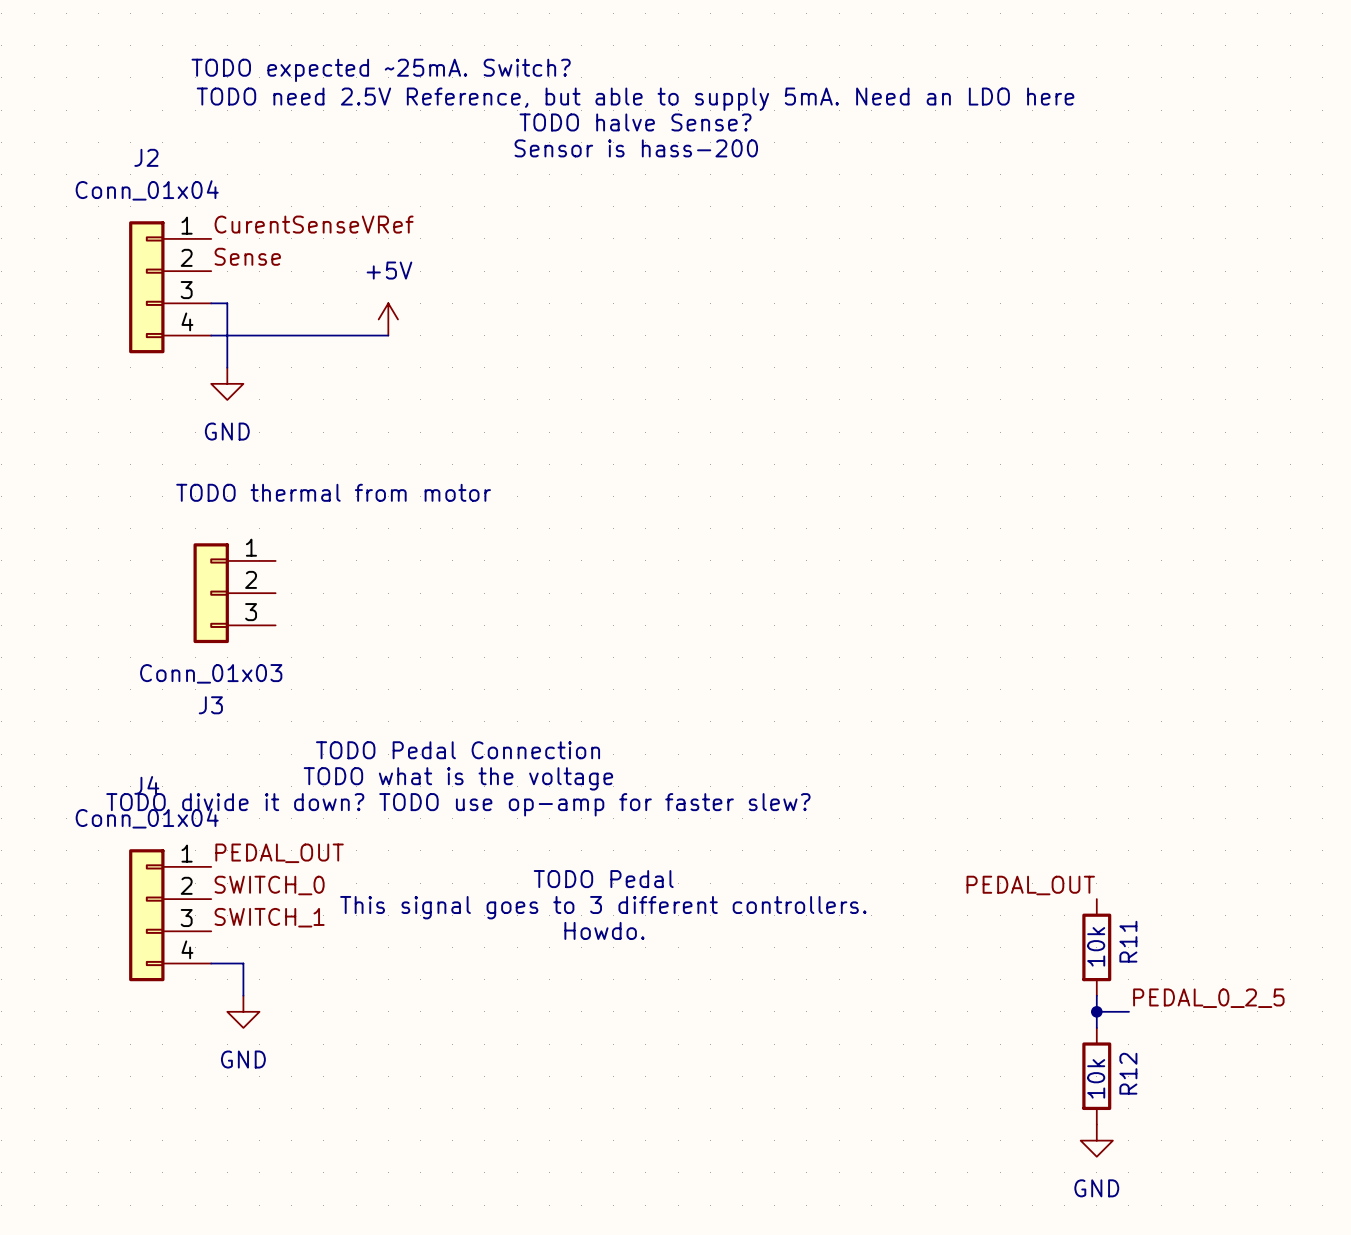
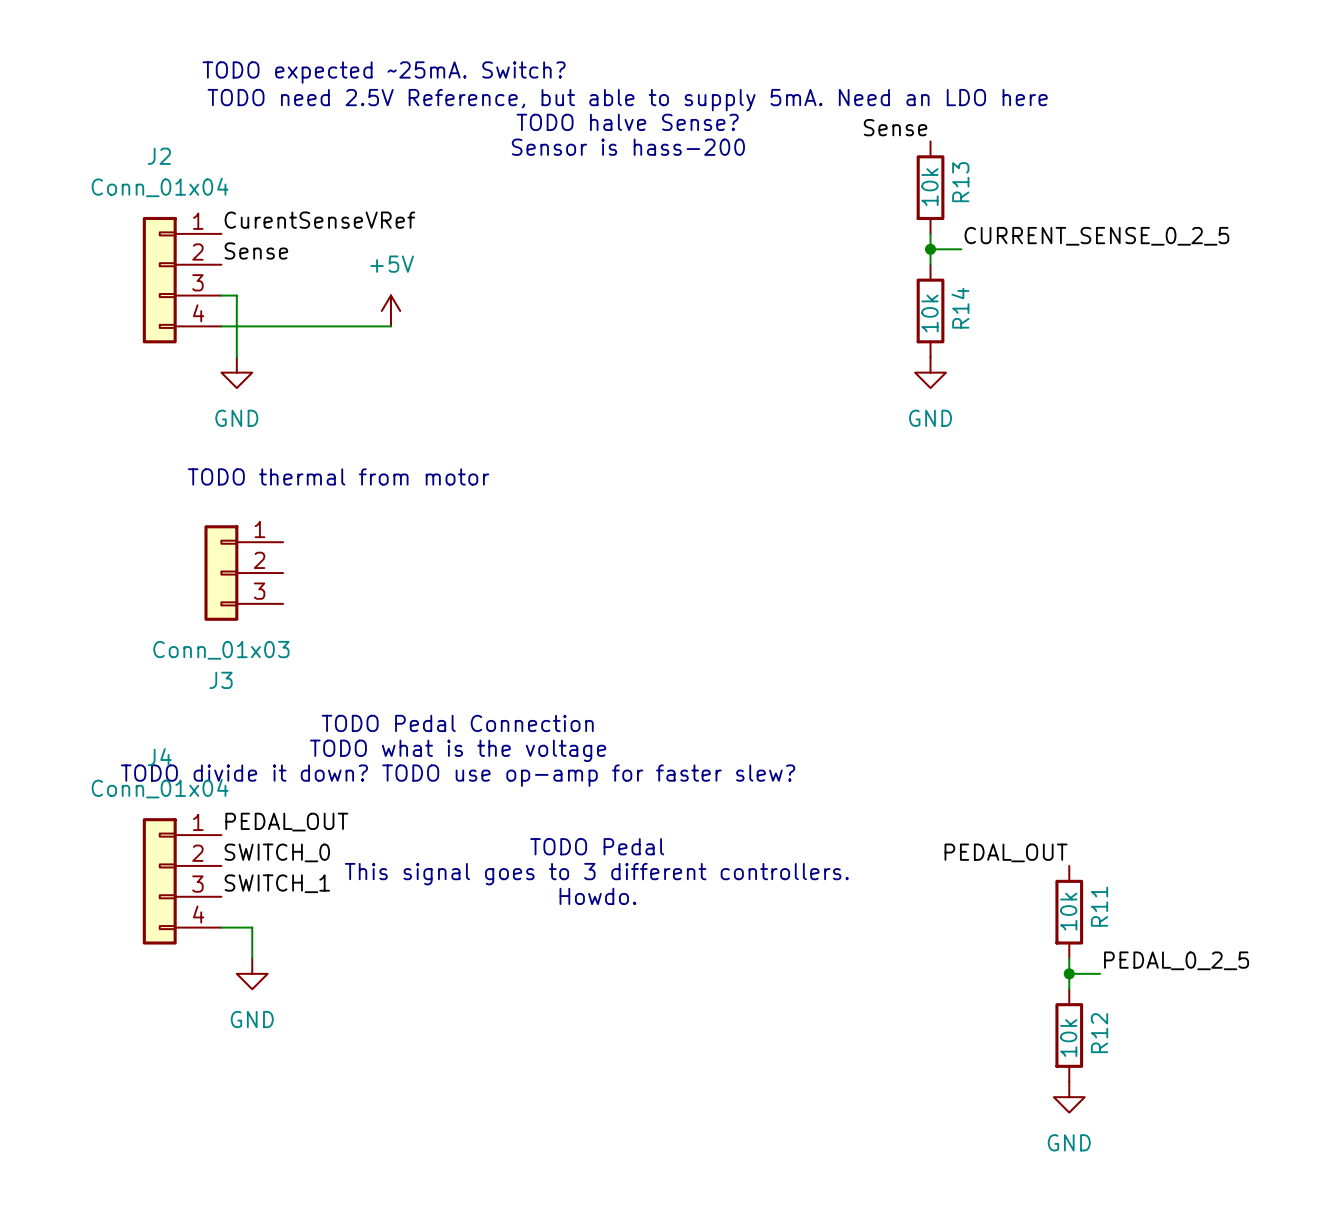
label: none -> Sense (895, 127)
R13: none -> 10k (930, 187)
wire: none -> (930, 233) (930, 264)
label: none -> CURRENT_SENSE_0_2_5 (1096, 236)
wire: none -> (930, 249) (961, 249)
junction: none -> (930, 249)
R14: none -> 10k (930, 310)
power symbol: none -> GND (930, 372)

